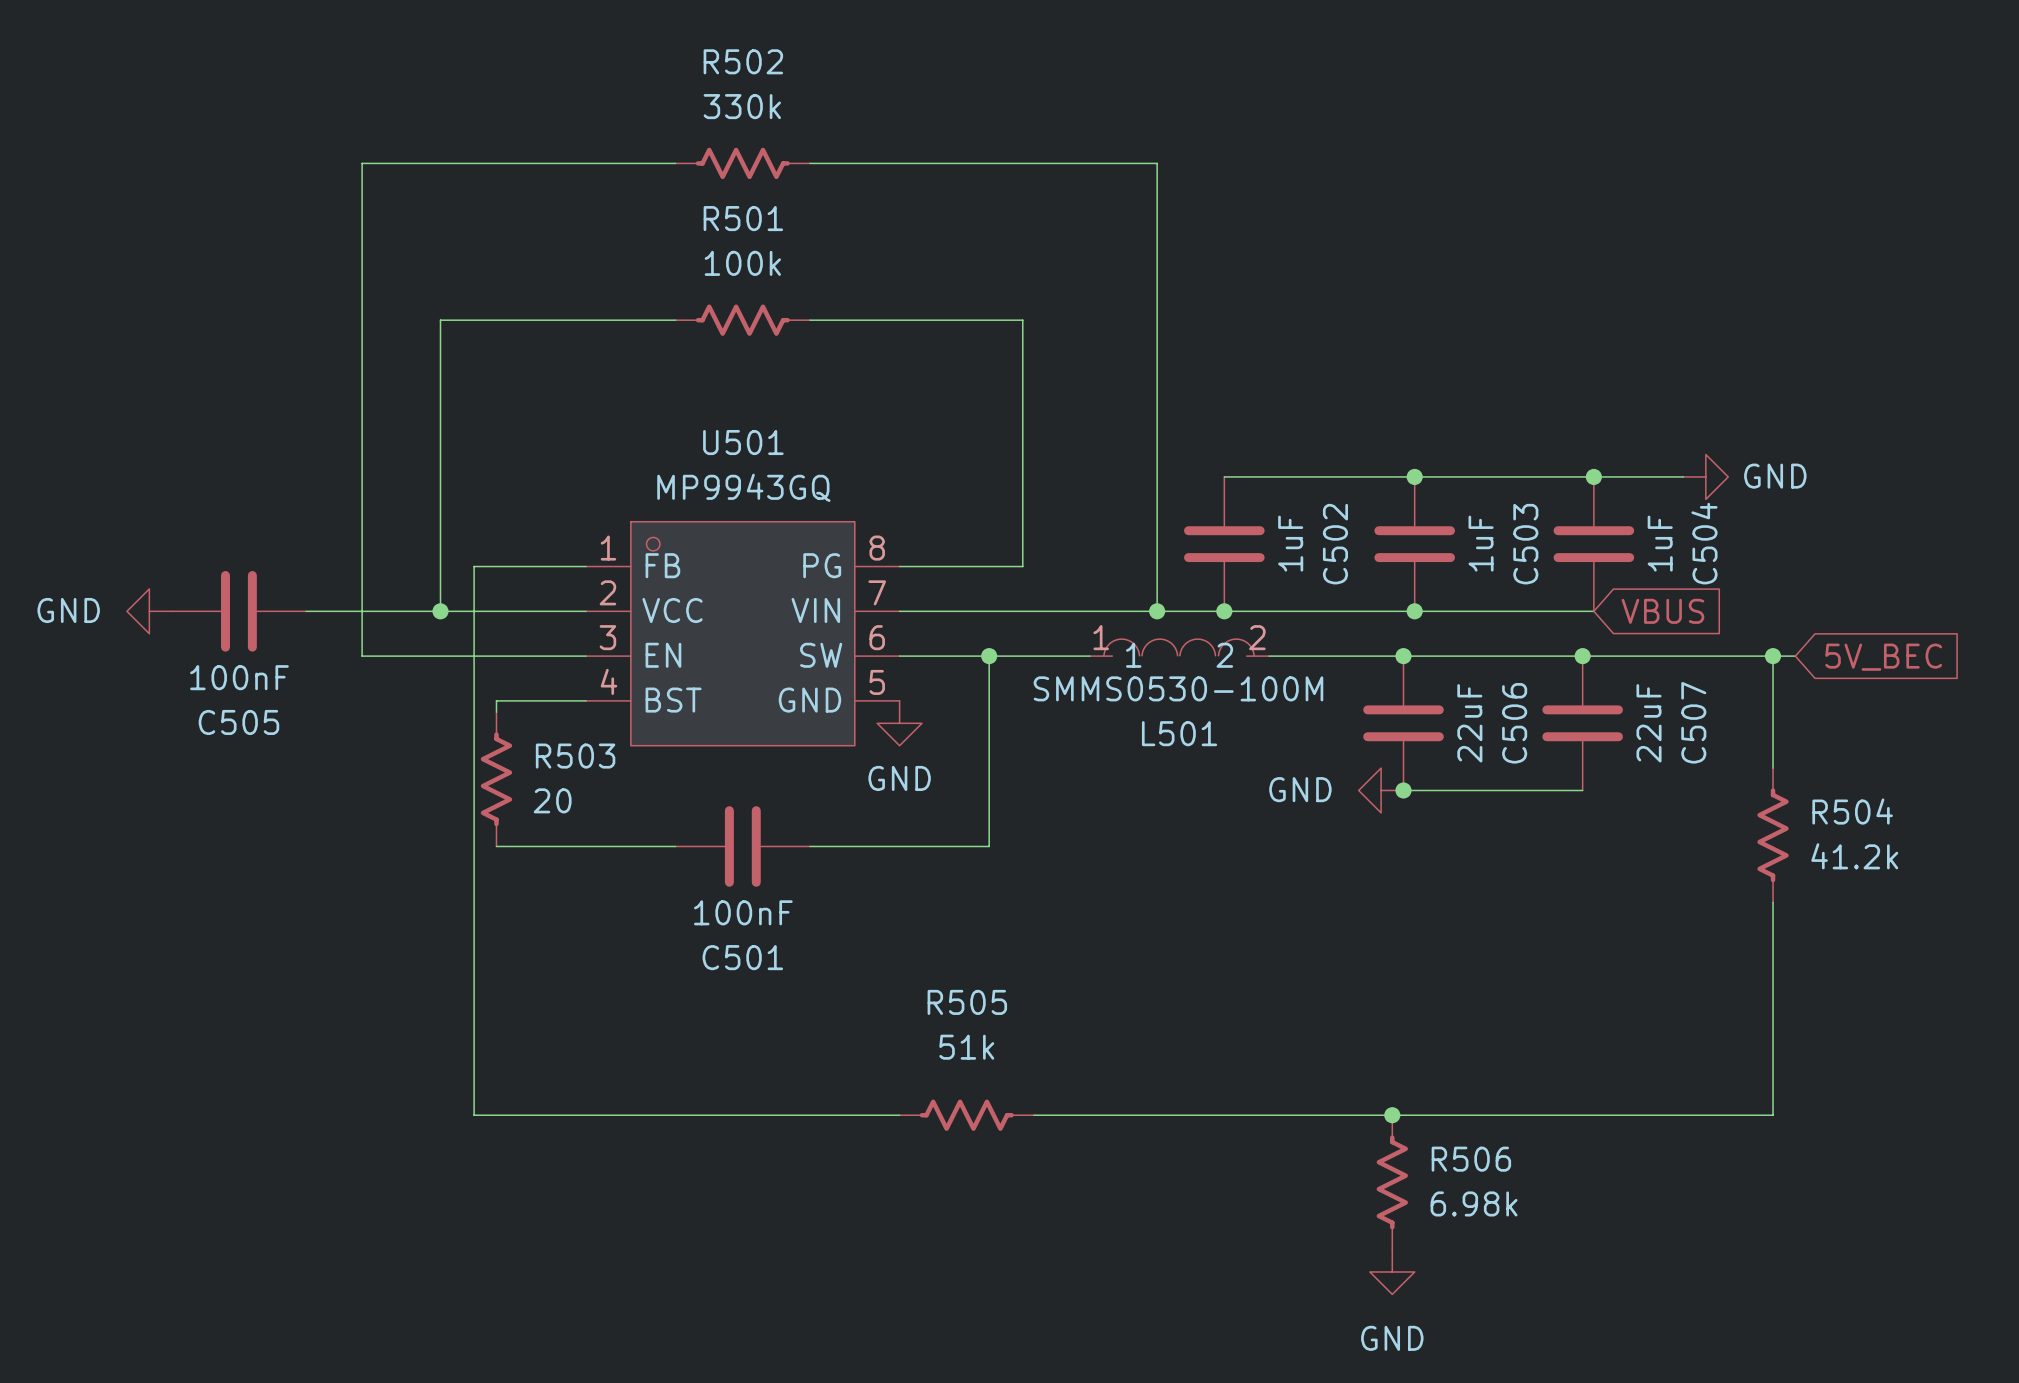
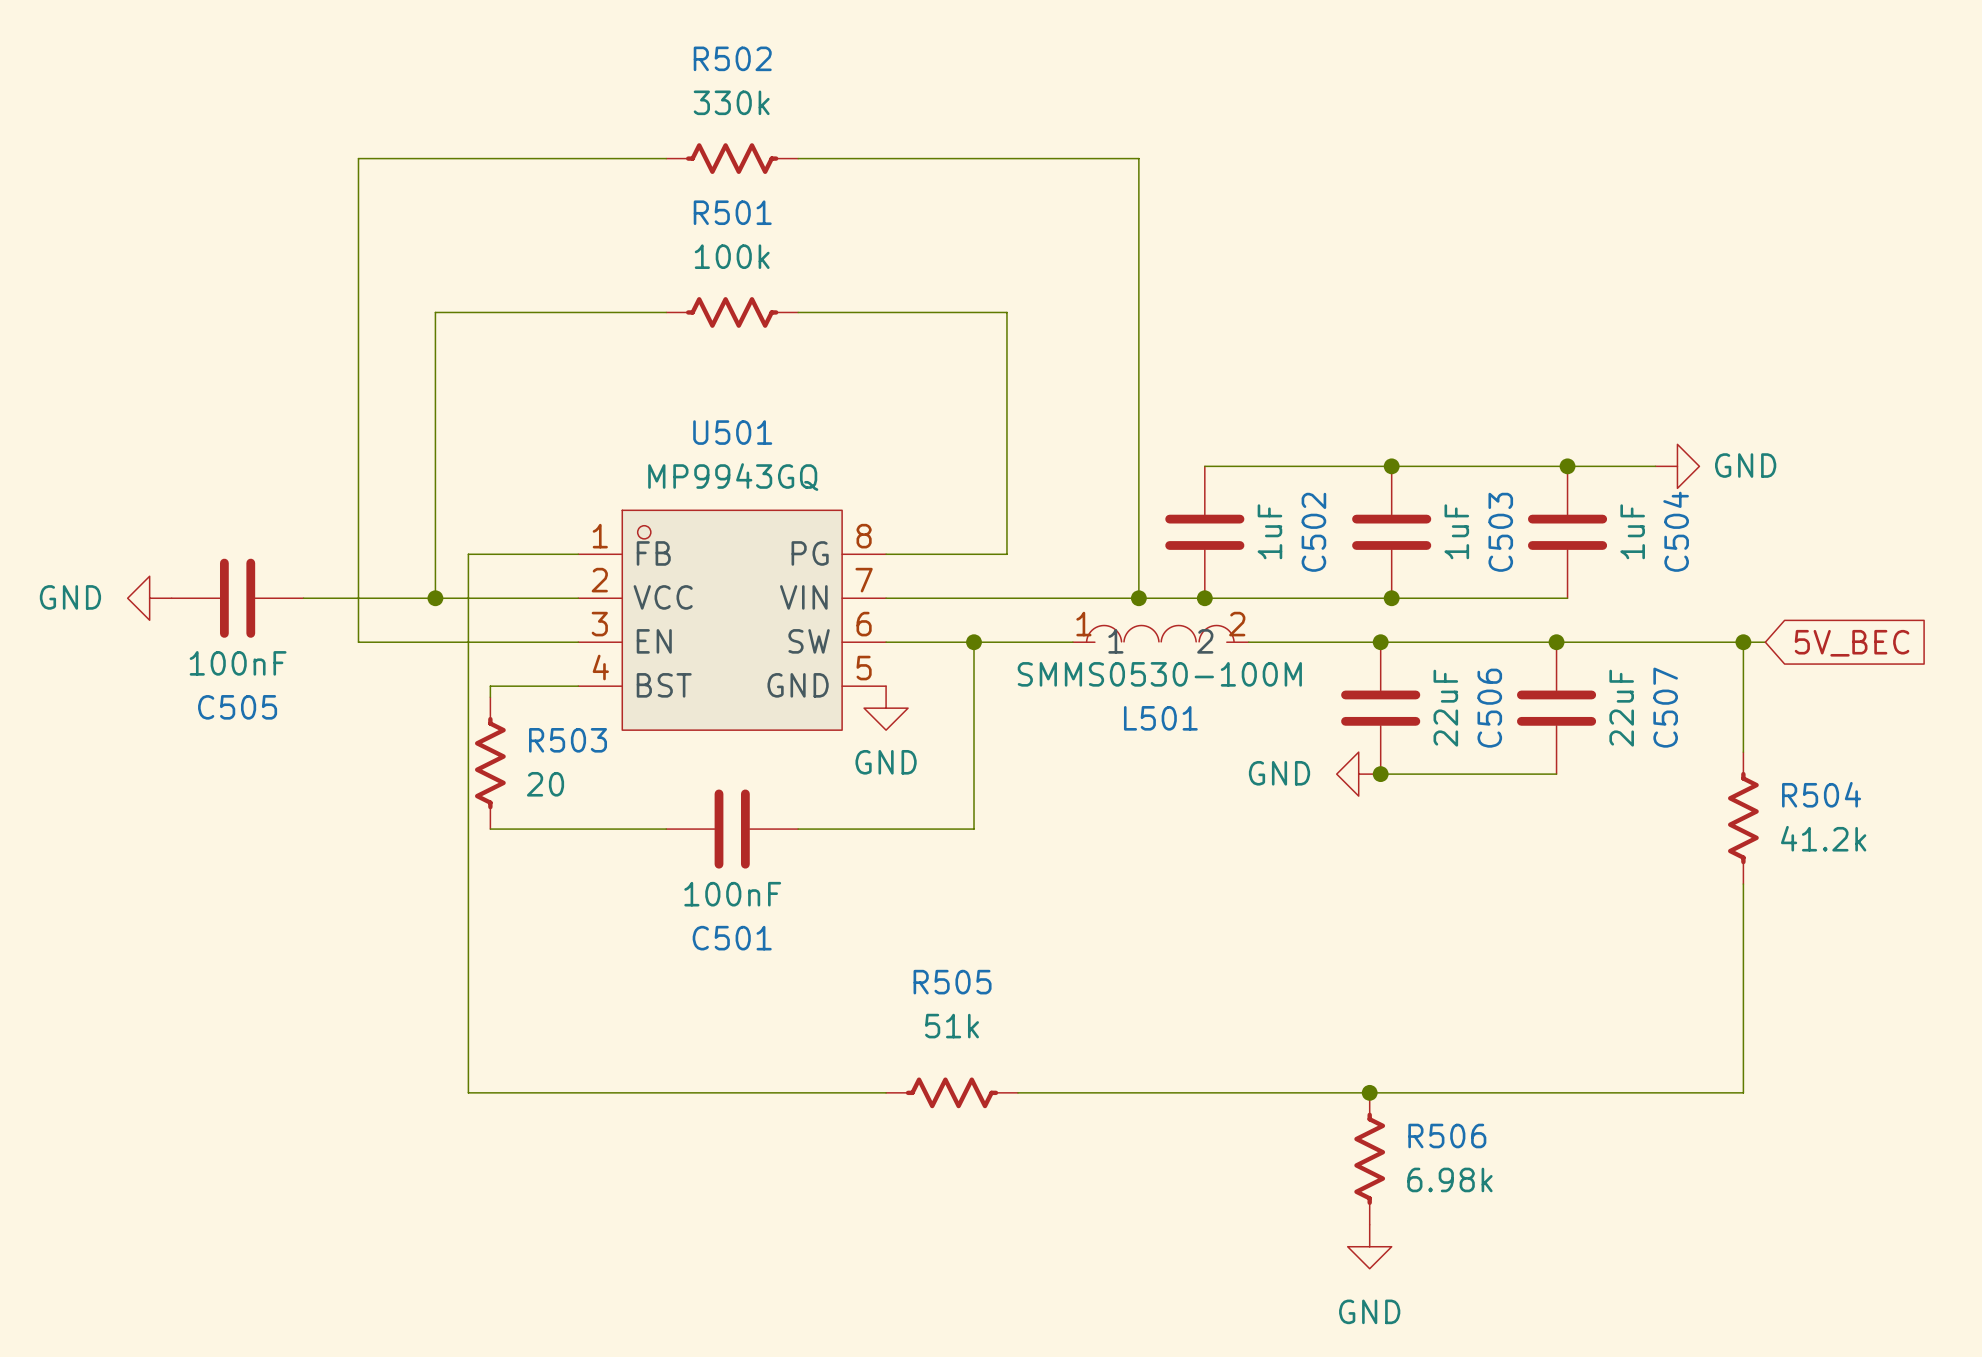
global label: VBUS (1662, 611) -> none

